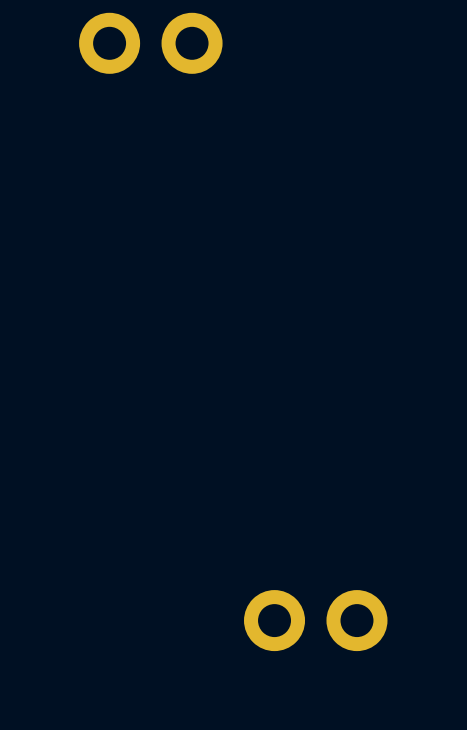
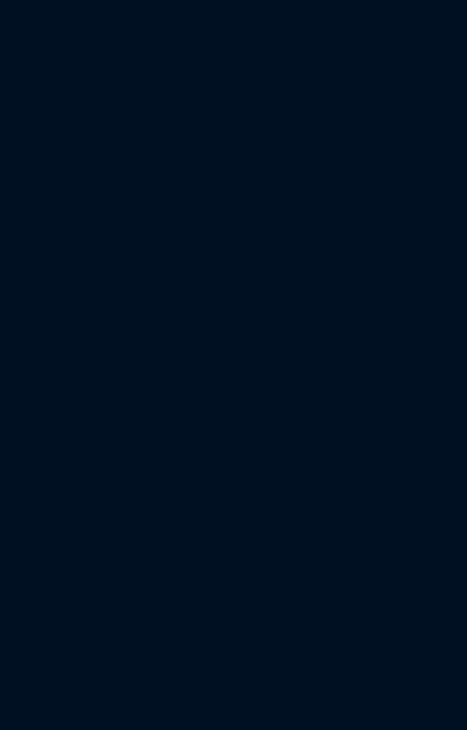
part: (150, 43) -> none
part: (315, 620) -> none

